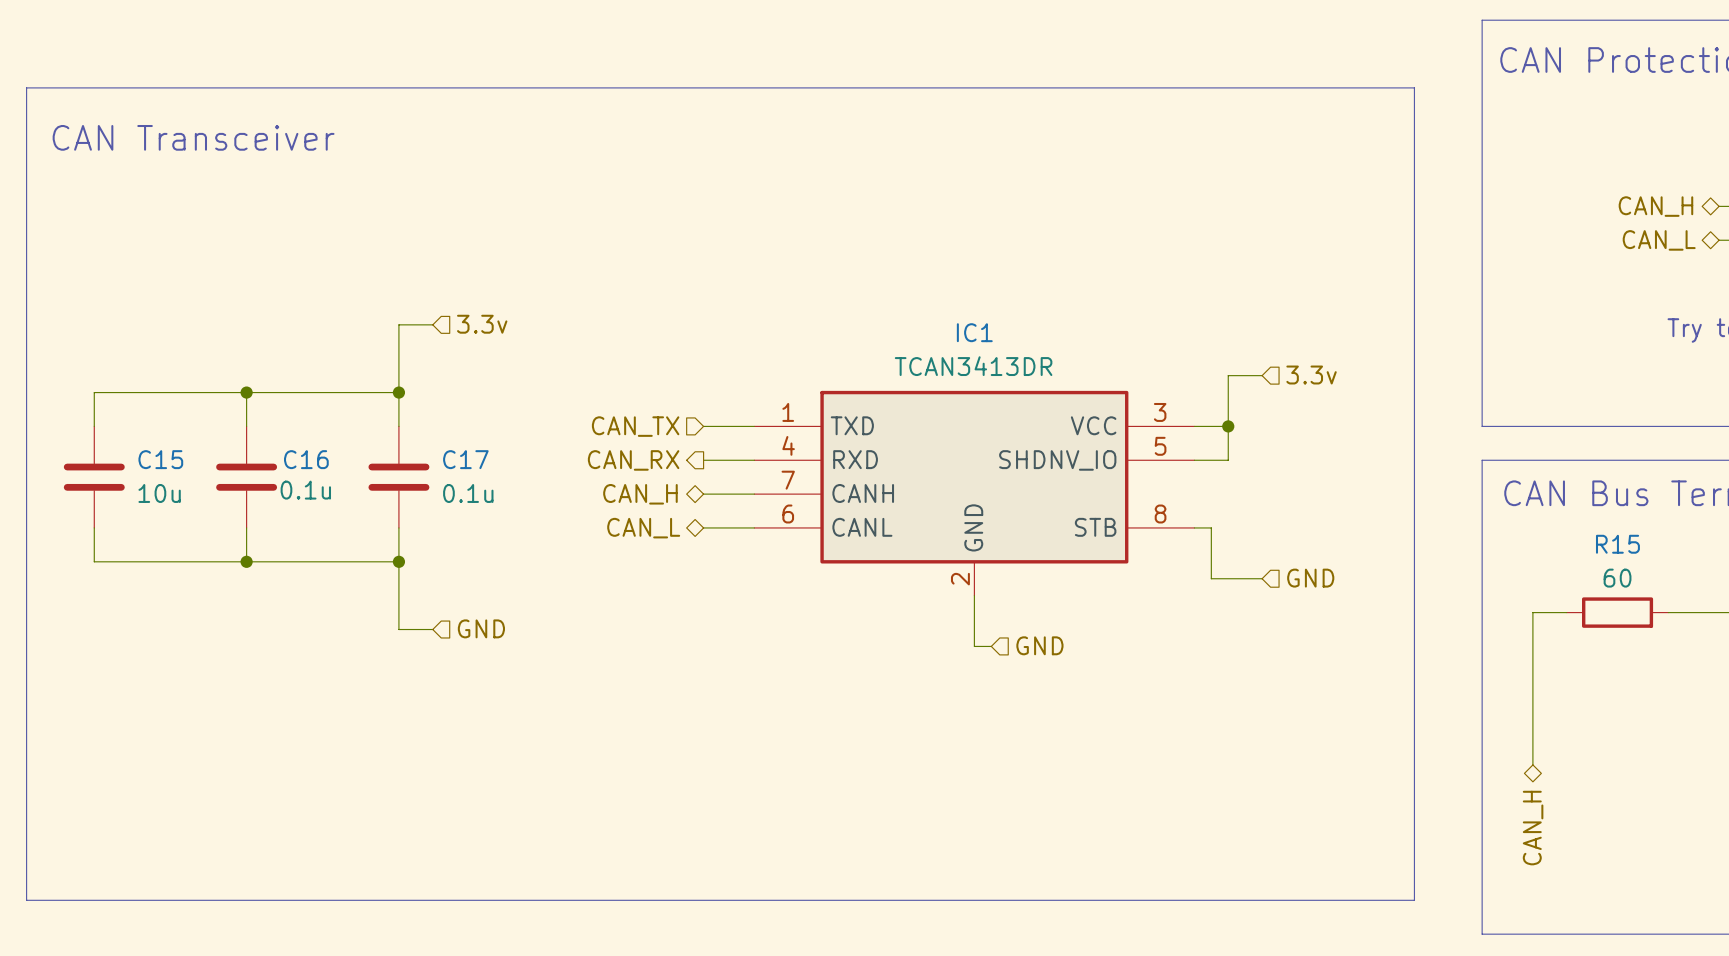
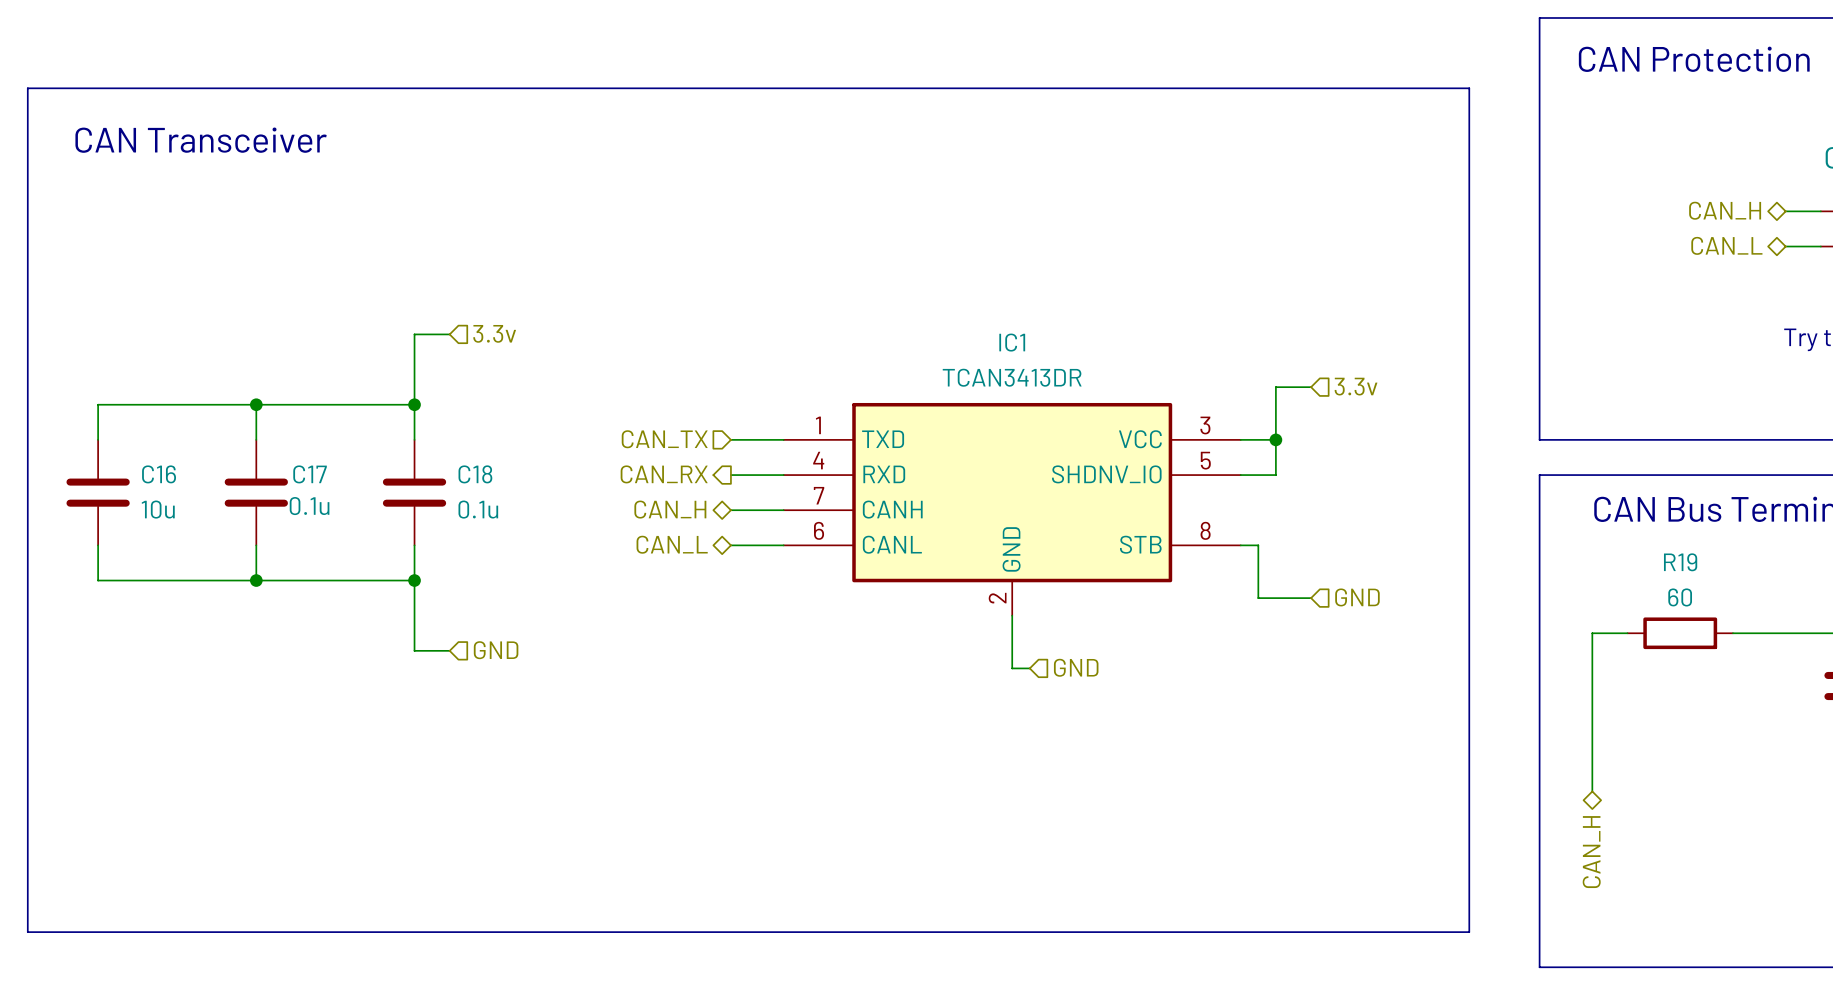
C15 name: C15 (160, 459) -> C16 (159, 474)
C16 name: C16 (306, 459) -> C17 (310, 474)
C17 name: C17 (465, 459) -> C18 (475, 474)
R15 name: R15 (1617, 544) -> R19 (1680, 562)

